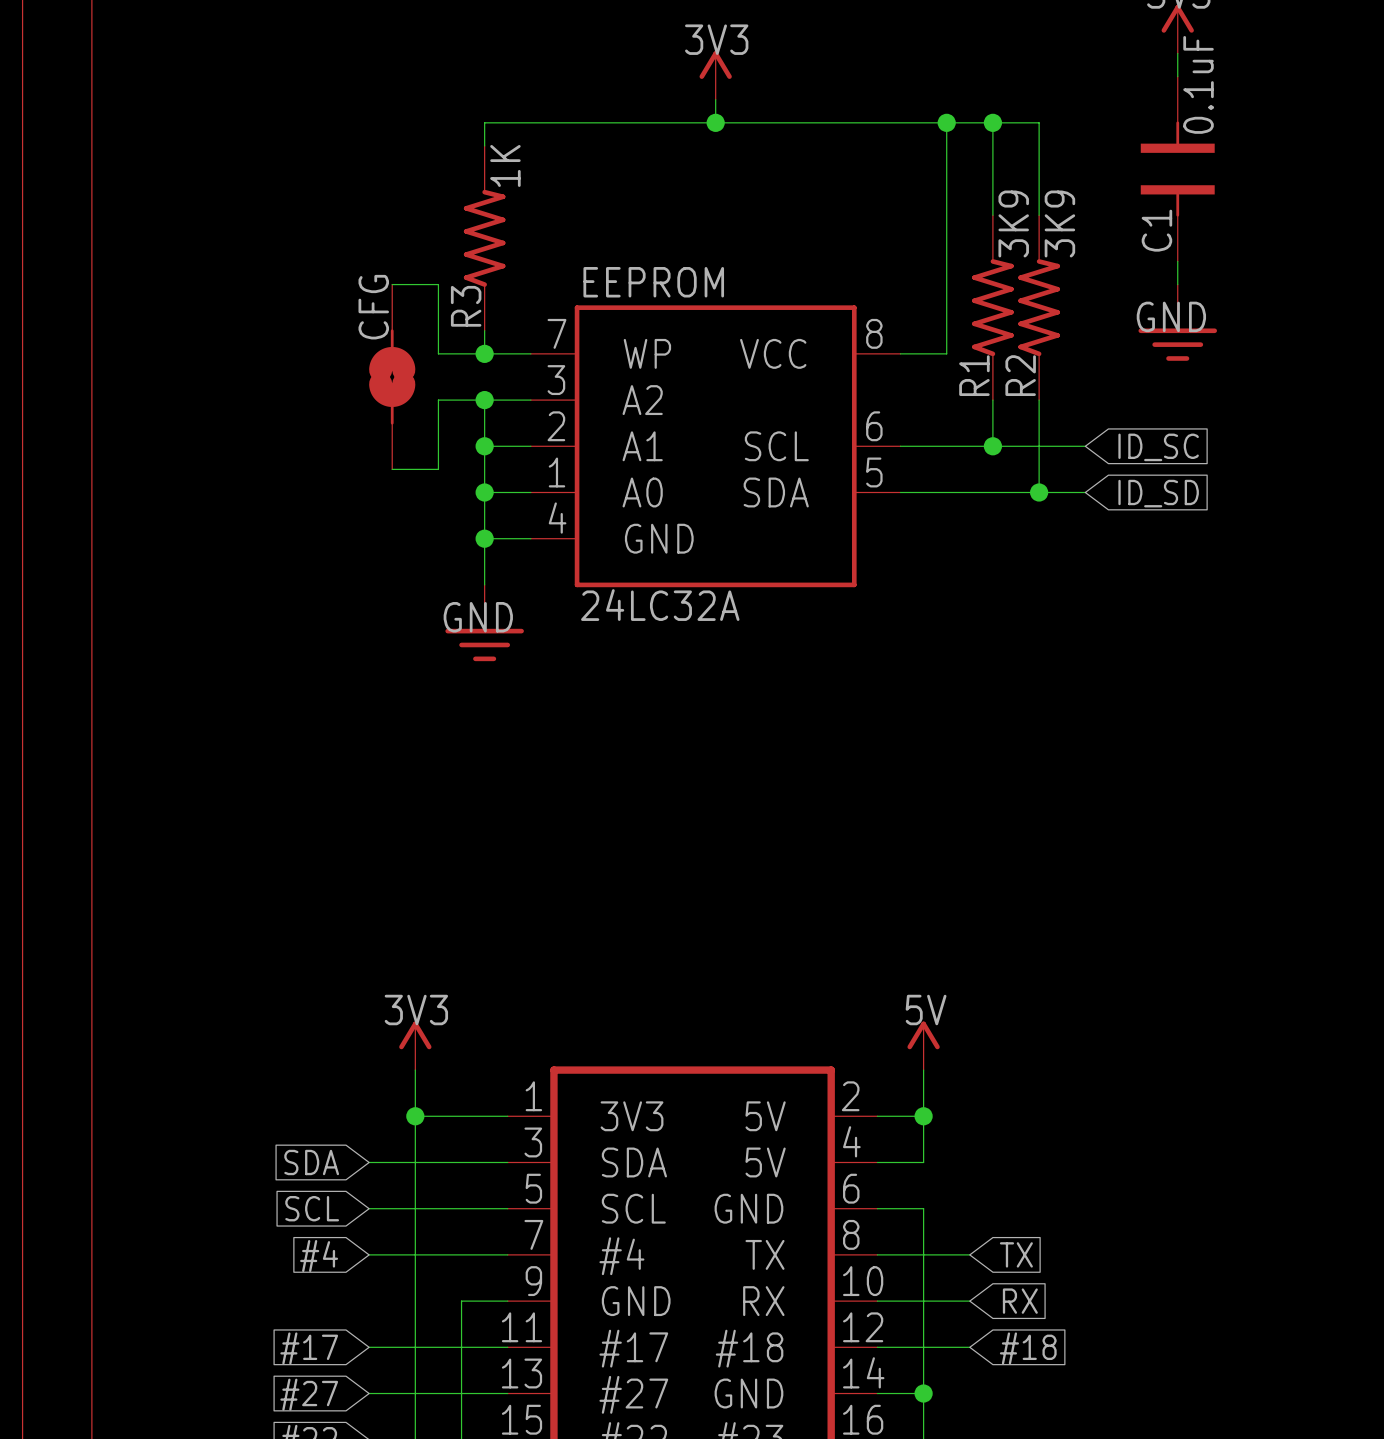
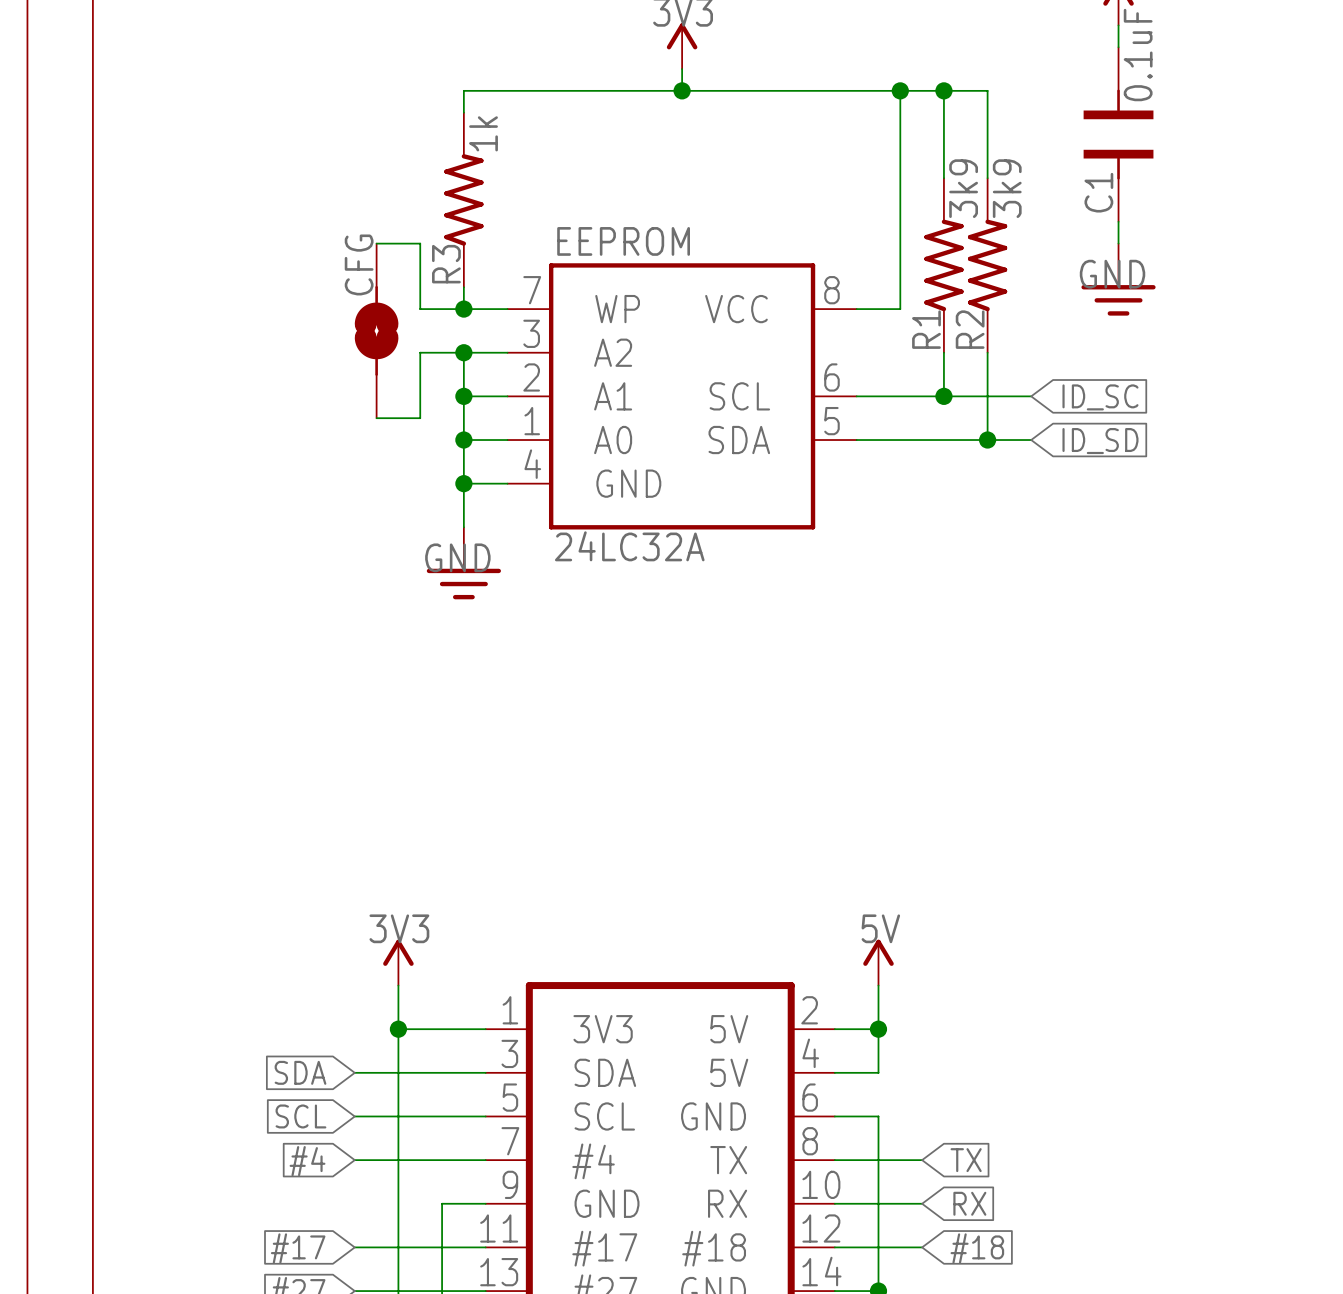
R3 value: 1K (505, 165) -> 1k (483, 133)
R1 value: 3K9 (1013, 223) -> 3k9 (963, 188)
R2 value: 3K9 (1059, 223) -> 3k9 (1007, 188)

